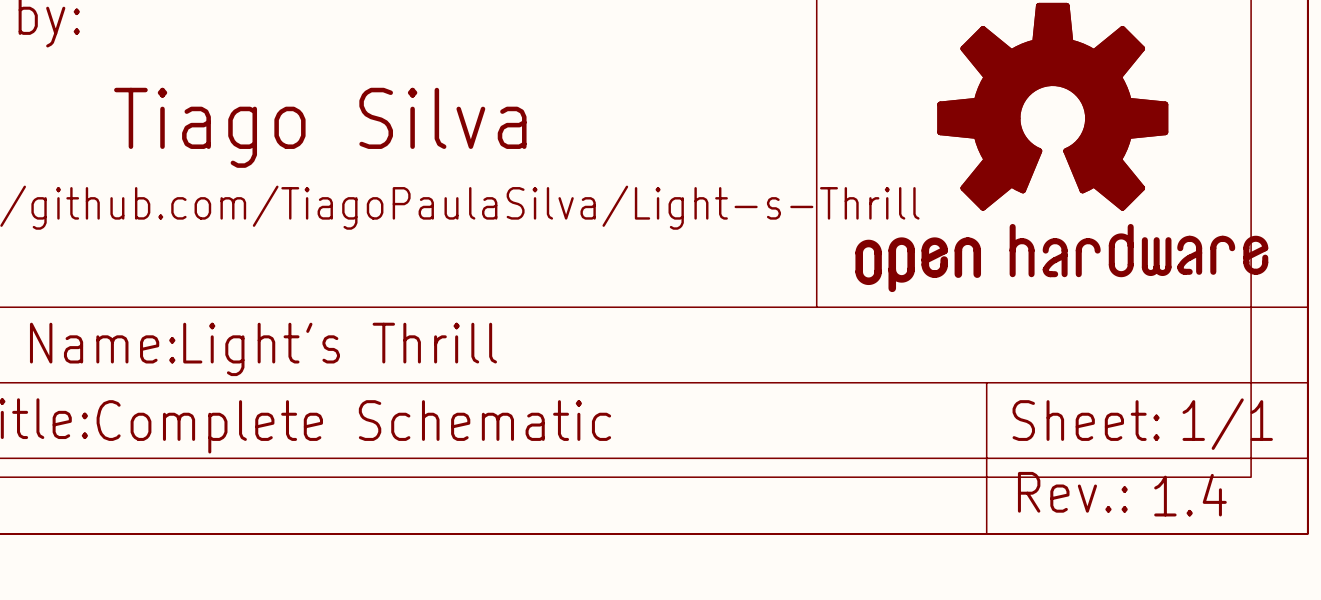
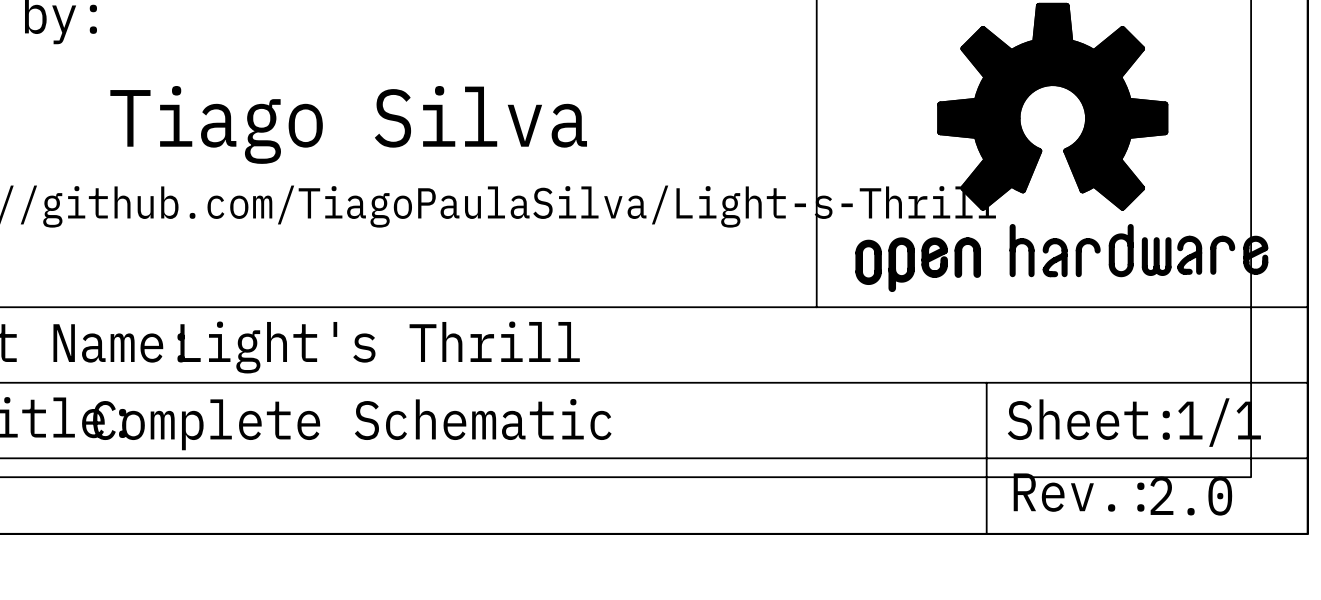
text: 1.4 (1190, 495) -> 2.0 (1191, 496)

